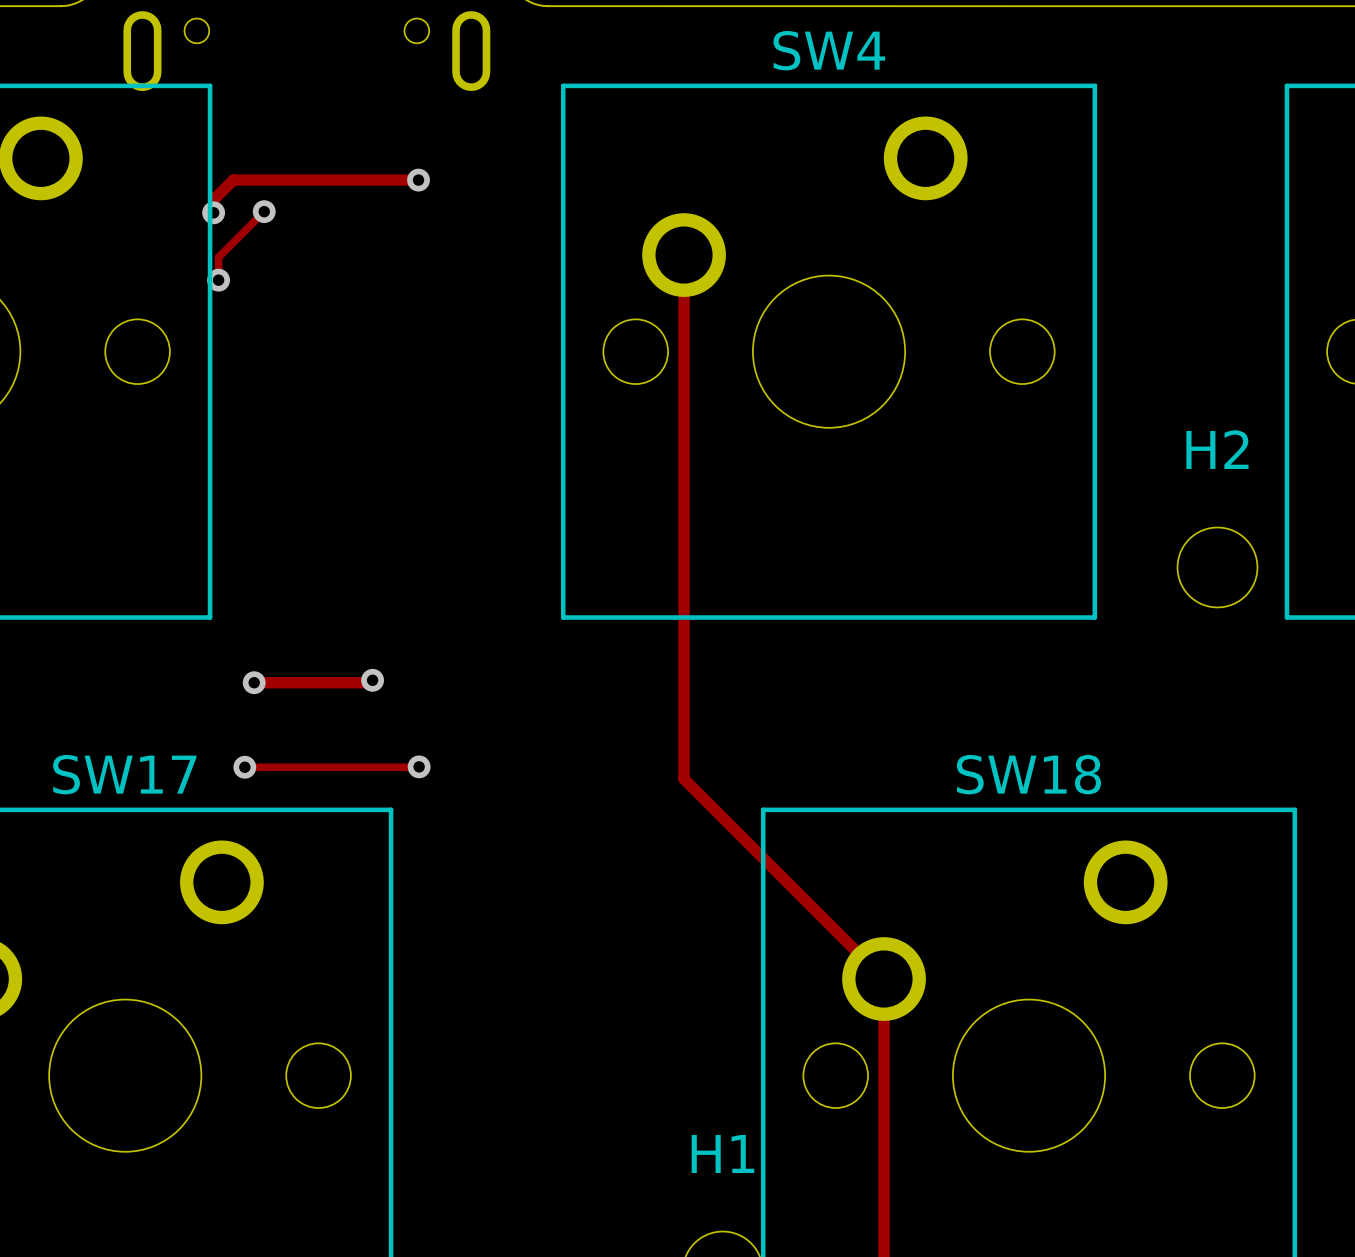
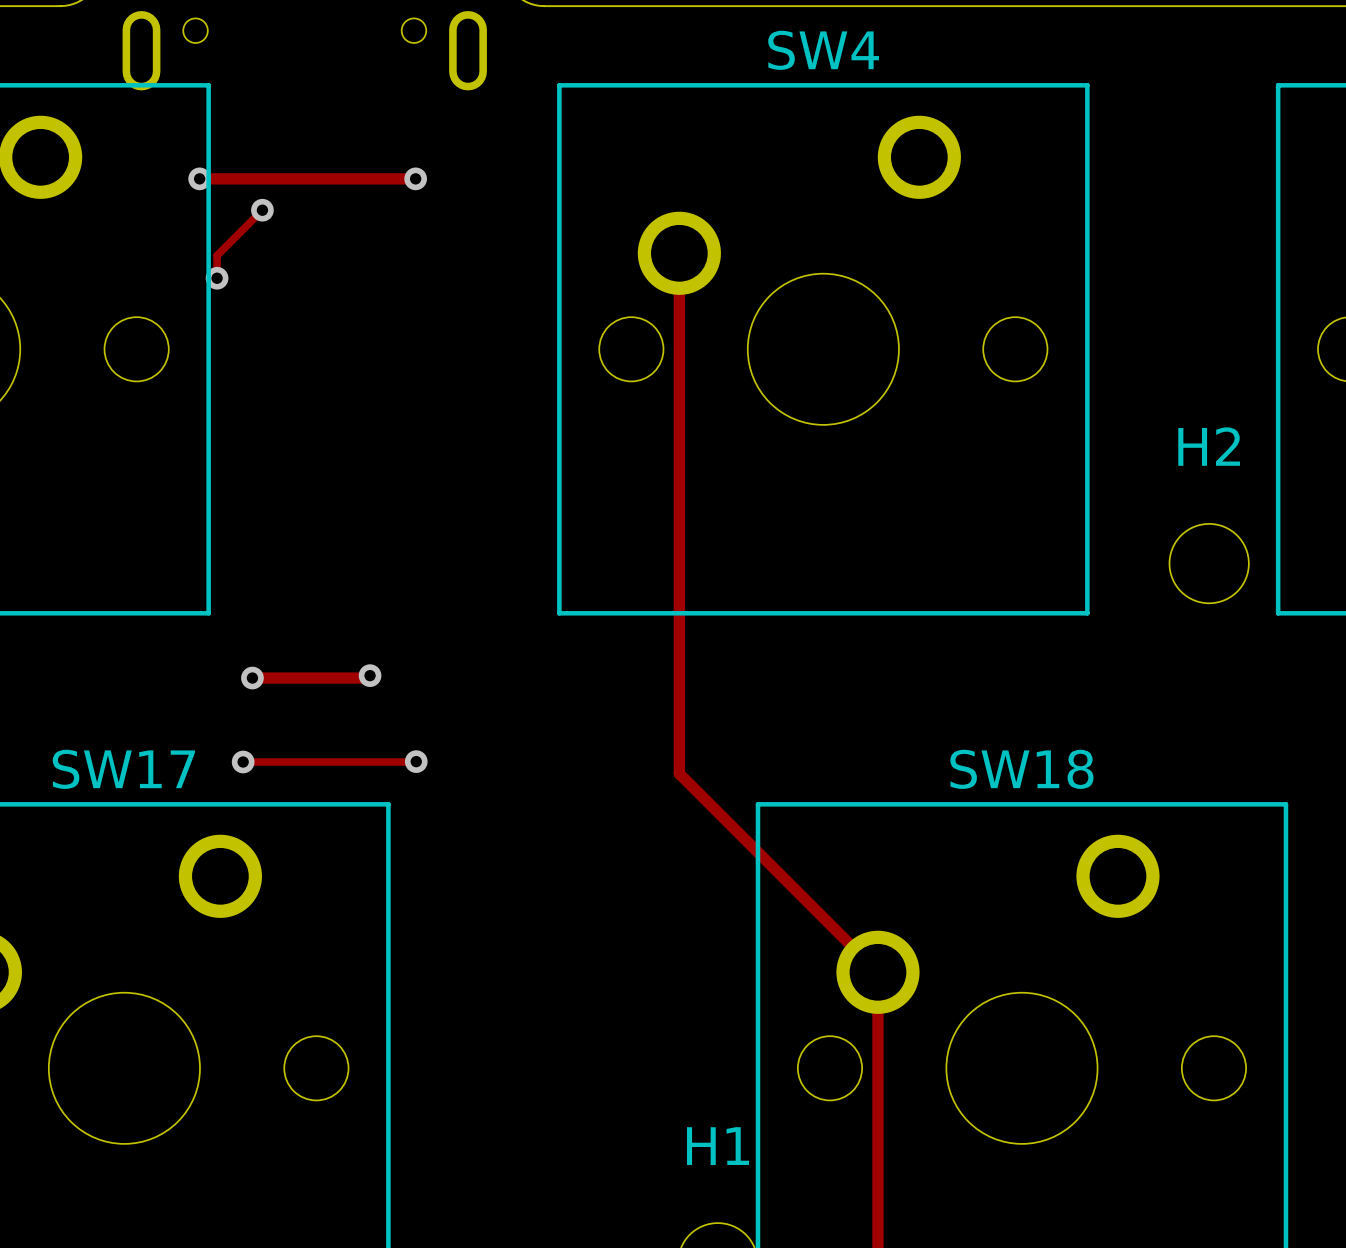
track: (233, 180) (213, 199) (213, 212) -> (231, 178) (199, 178)
via position: (213, 212) -> (199, 178)

